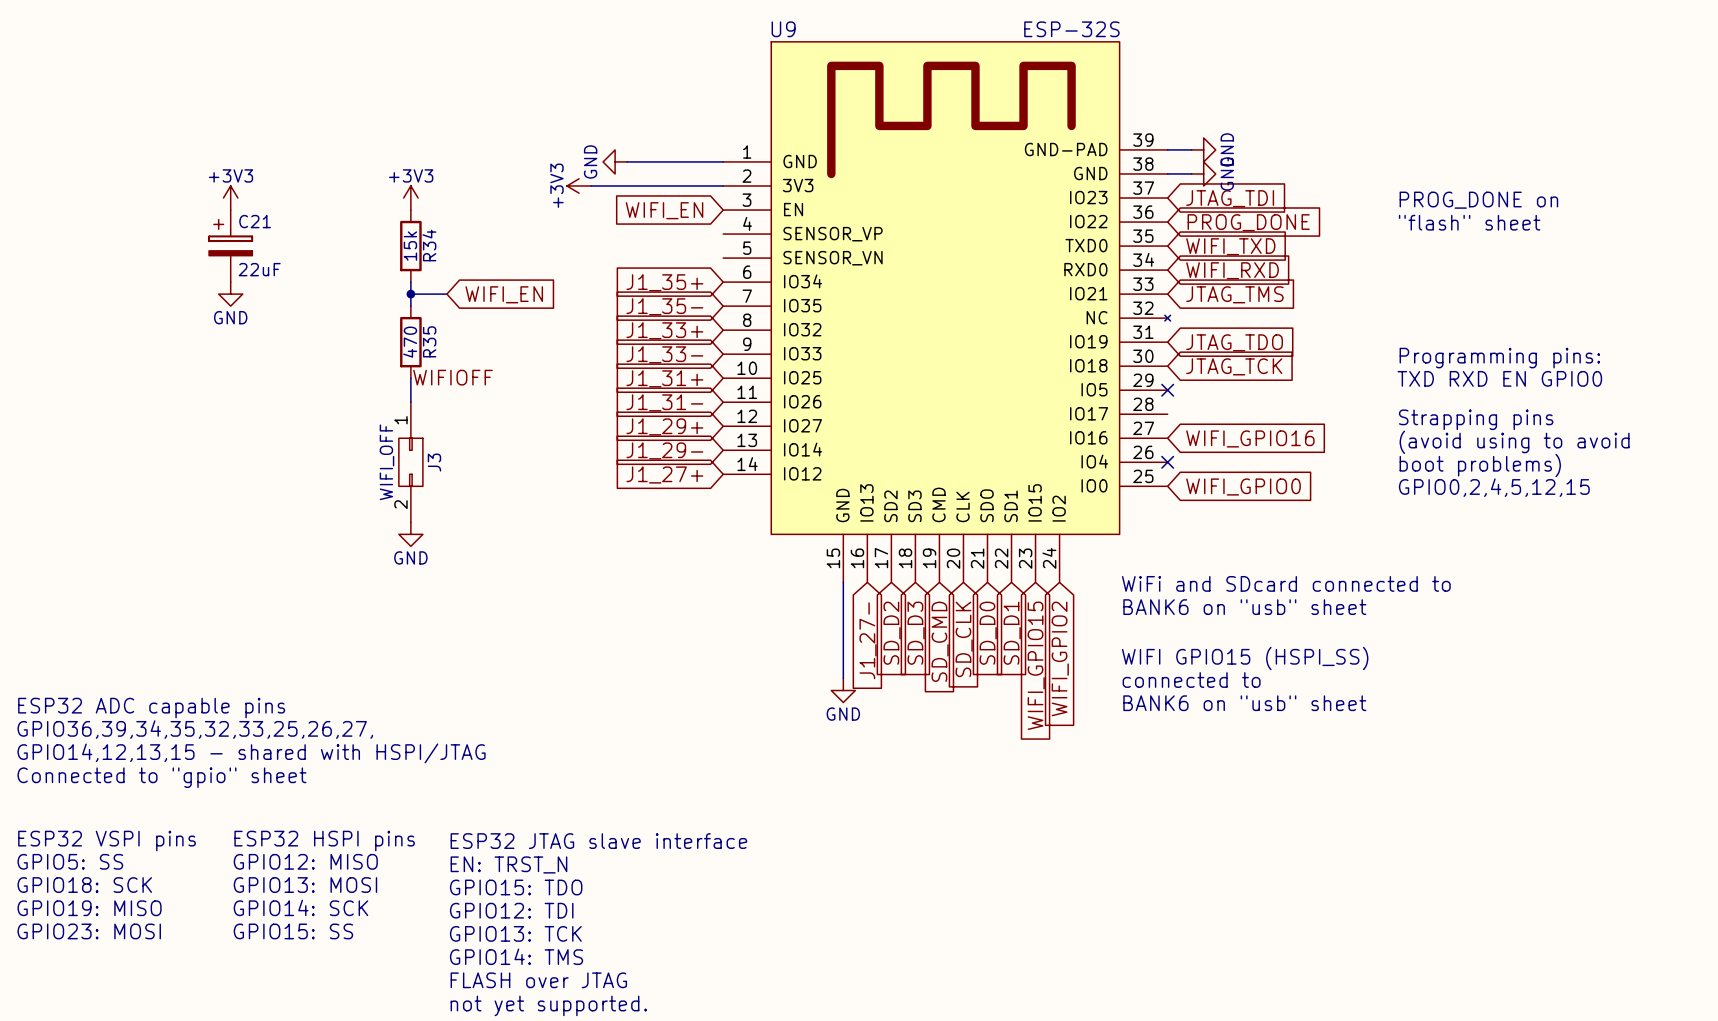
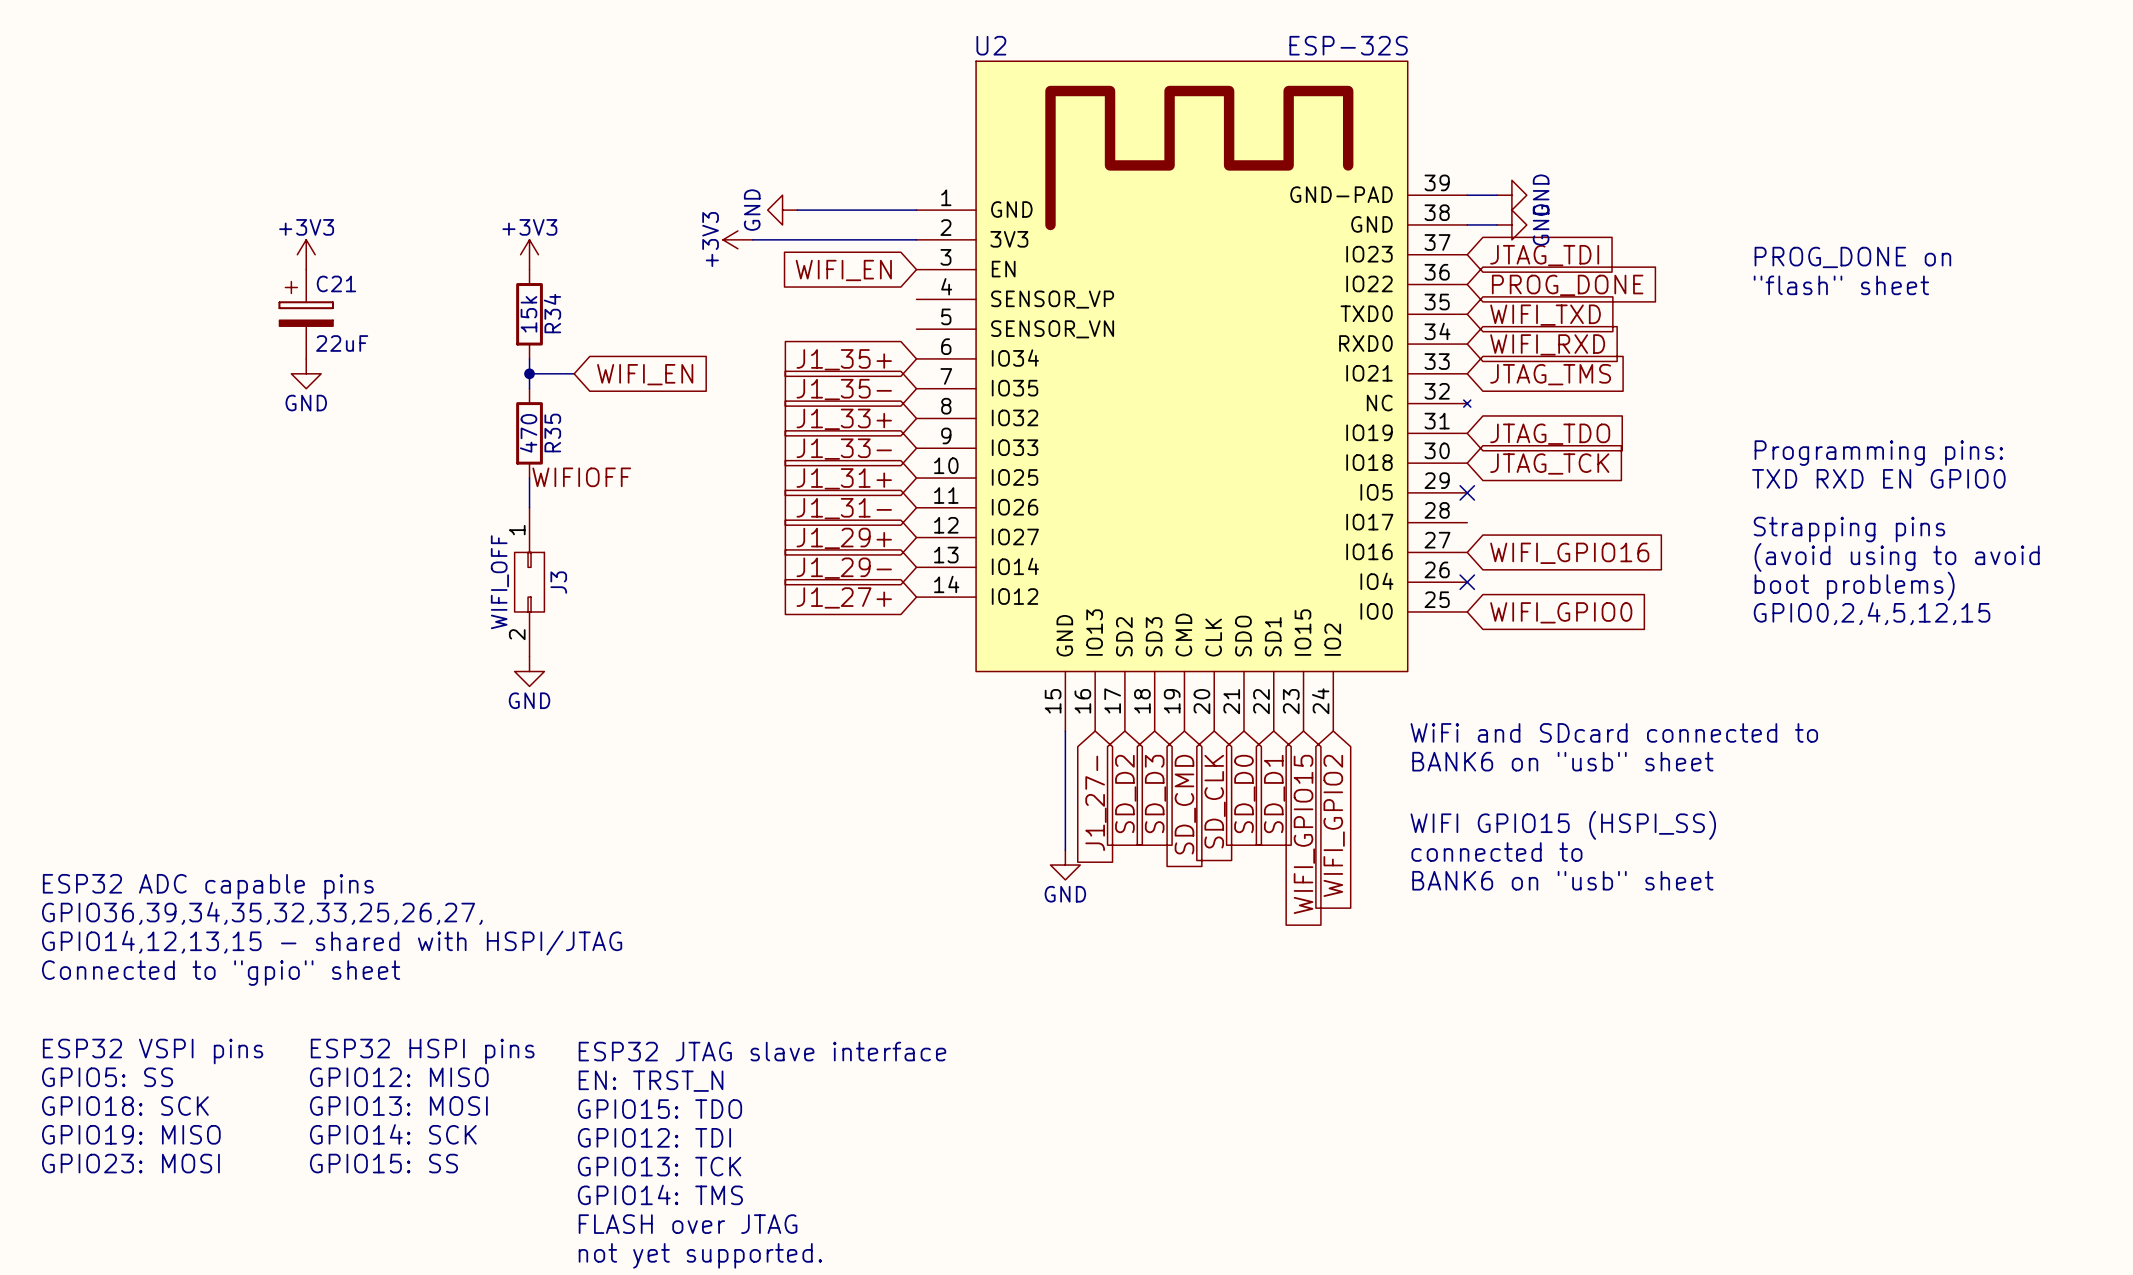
U9 name: U9 (783, 29) -> U2 (991, 45)

